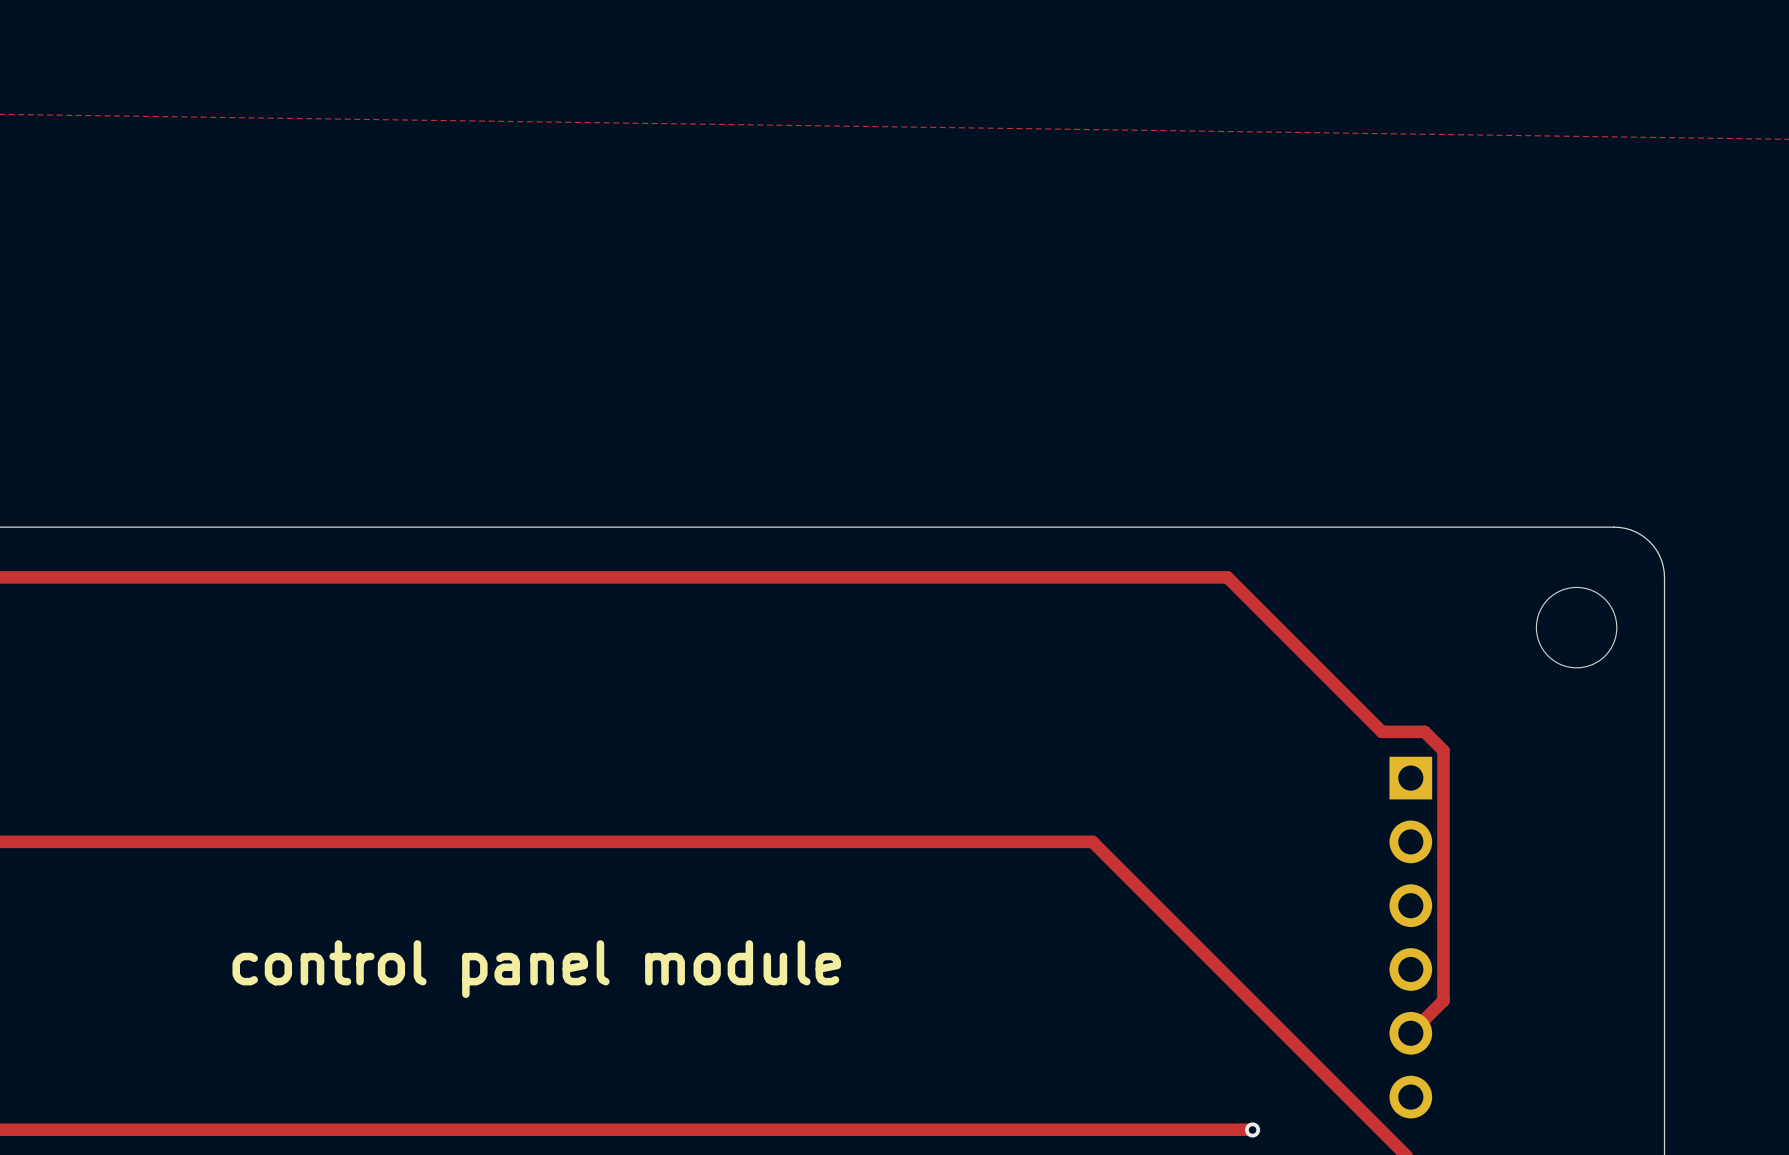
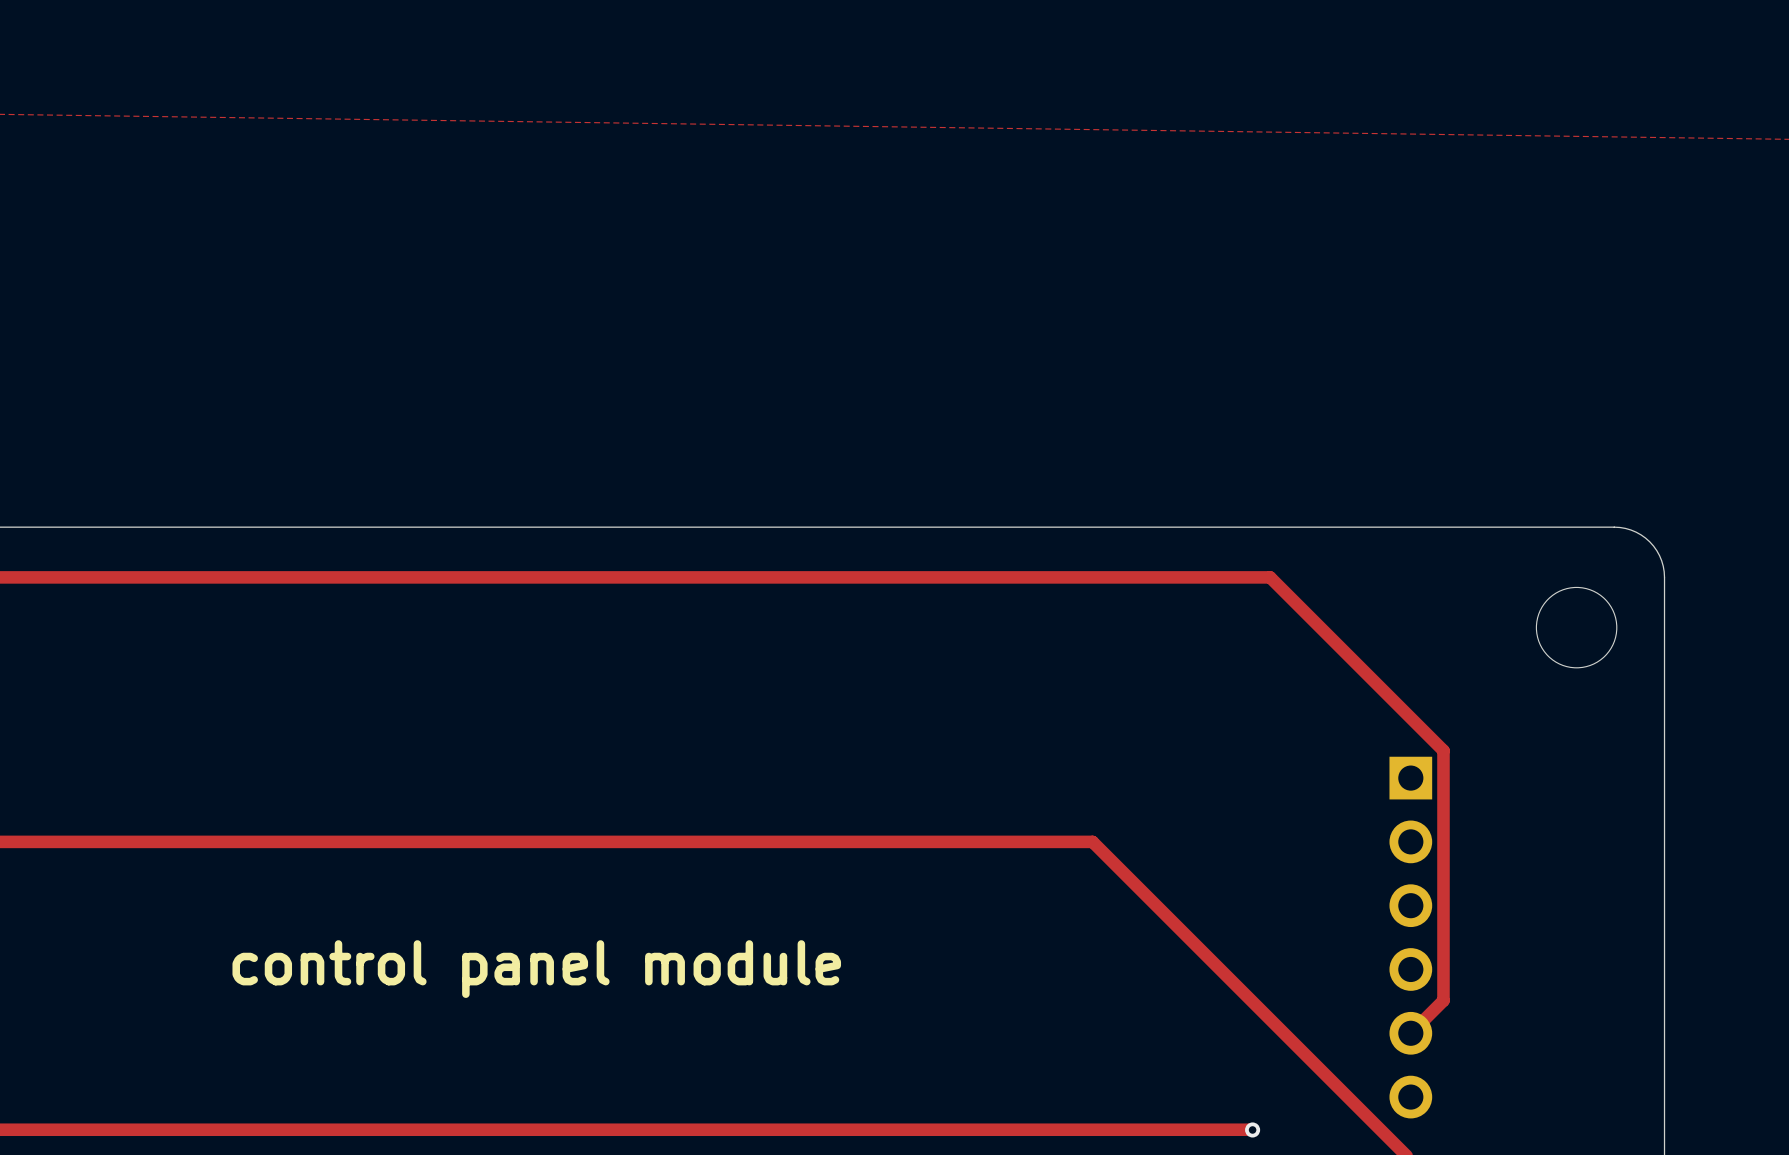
track: (1227, 577) (1381, 731) (1424, 731) -> (1227, 577) (1270, 577) (1424, 731)

